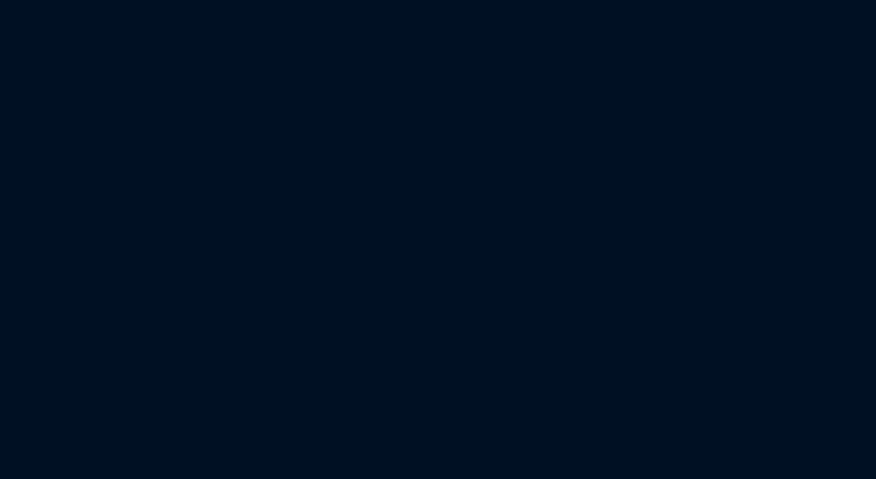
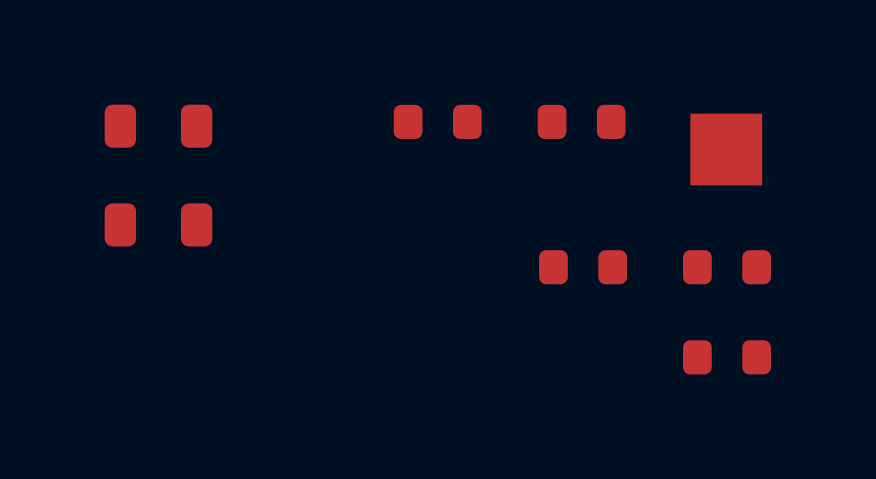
part: none -> (437, 121)
part: none -> (581, 121)
part: none -> (158, 126)
part: none -> (726, 149)
part: none -> (158, 224)
part: none -> (583, 267)
part: none -> (727, 267)
part: none -> (727, 357)

